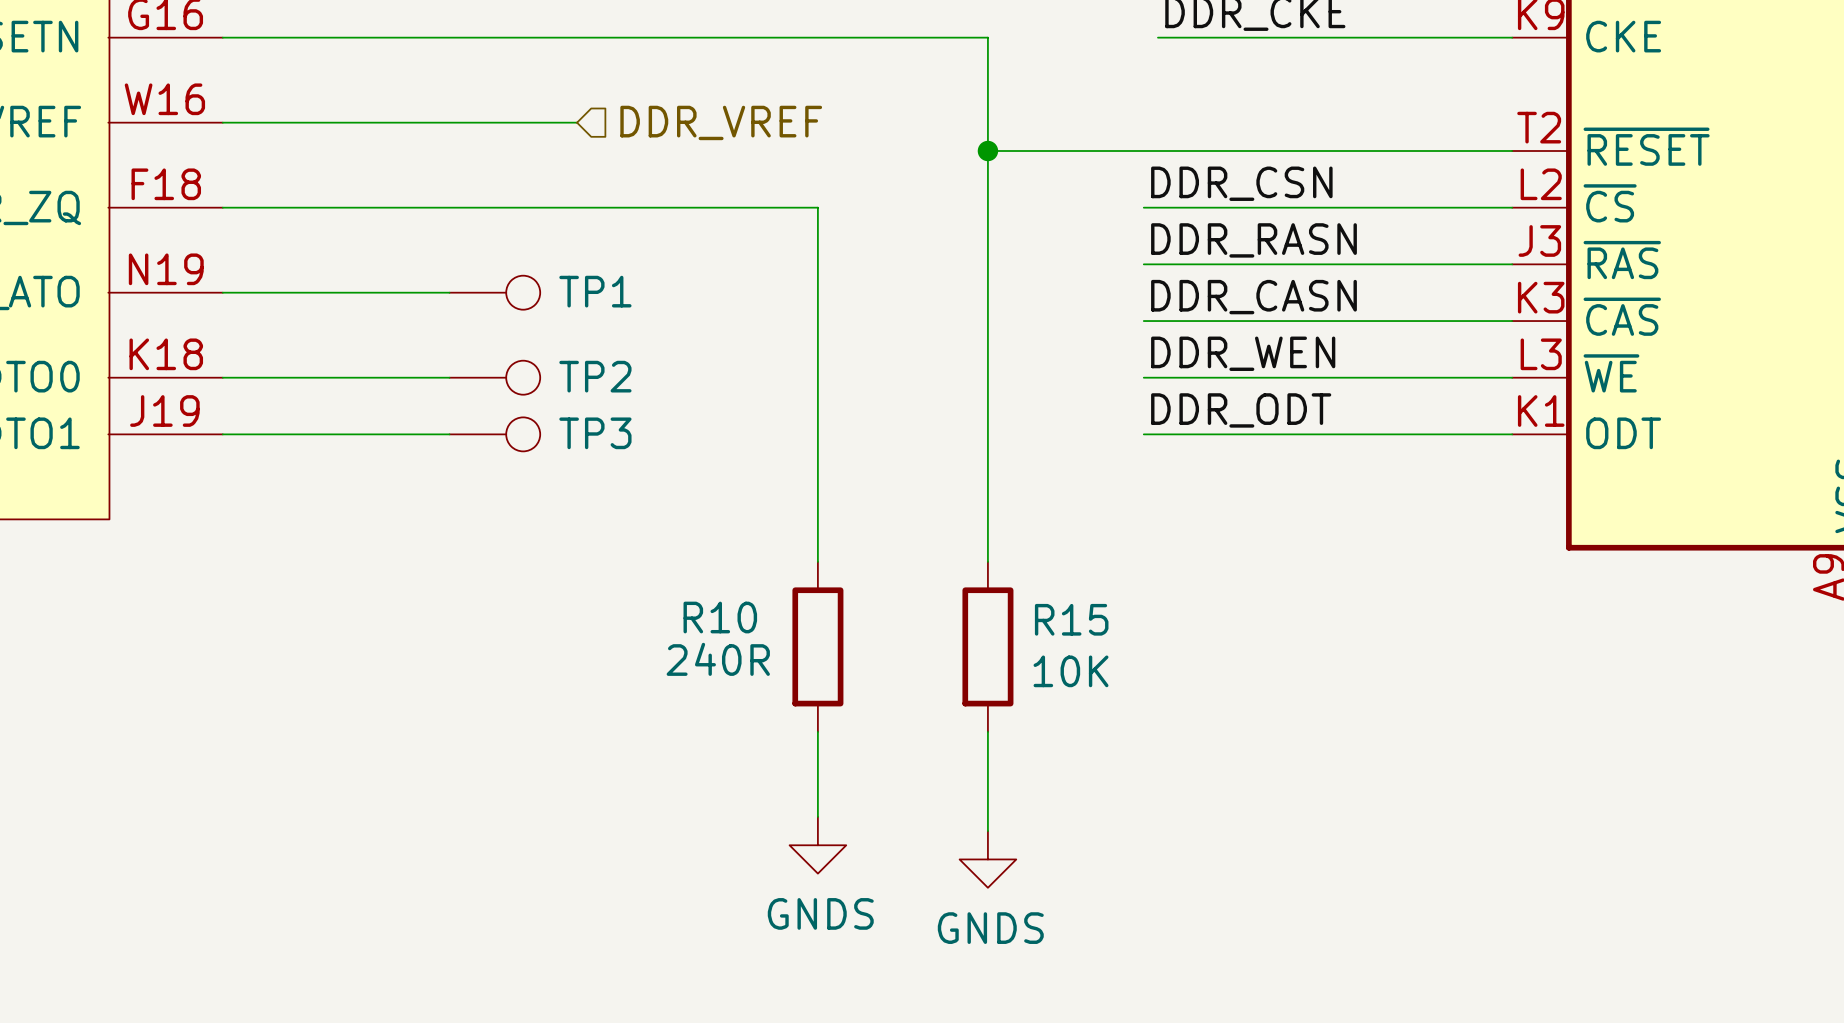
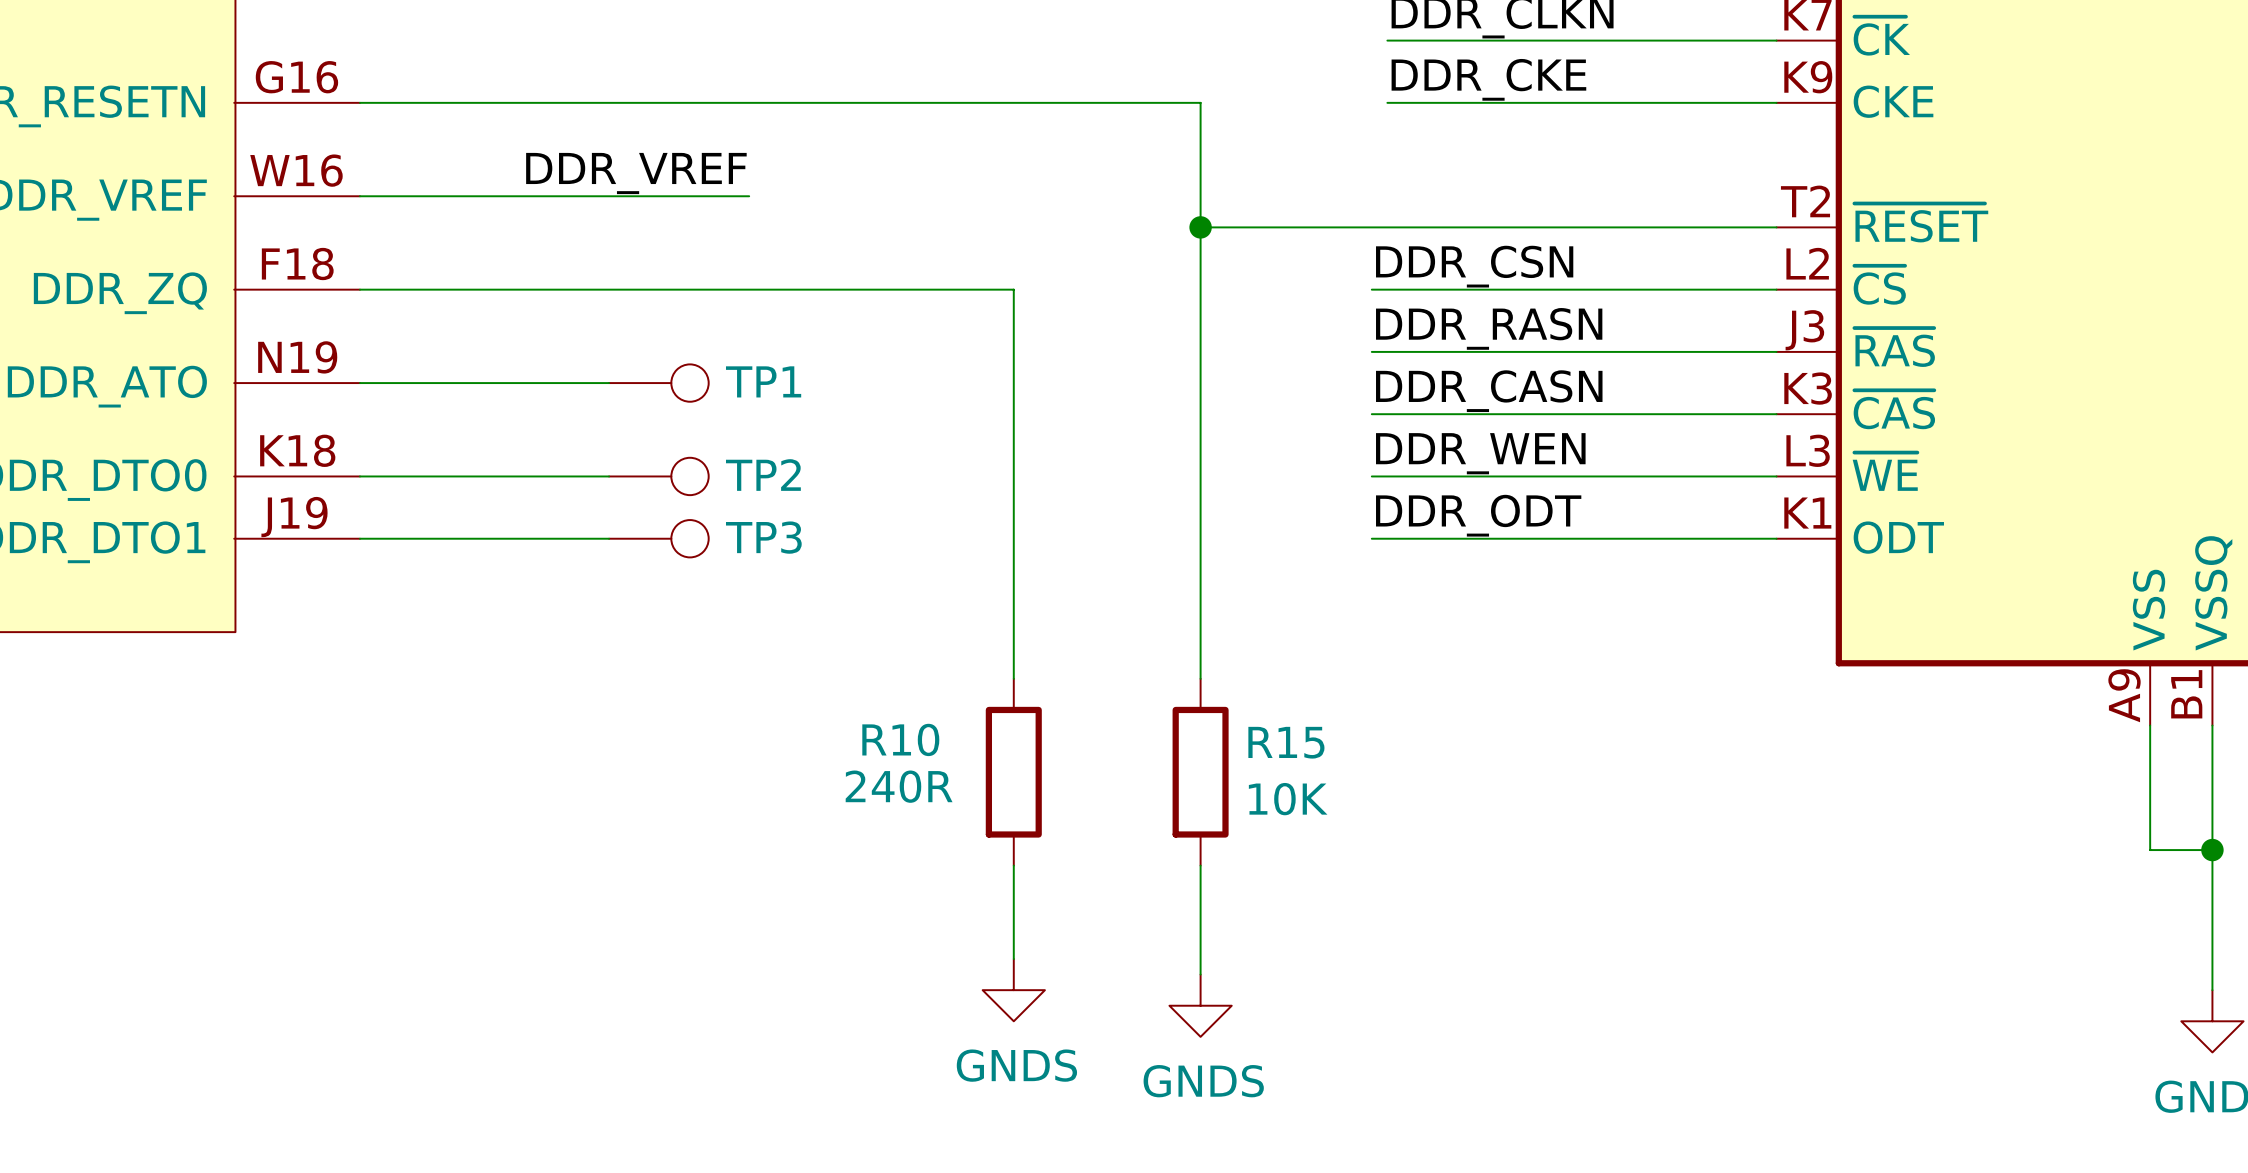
label: none -> DDR_VREF (636, 173)
hierarchical label: DDR_VREF (721, 122) -> none

